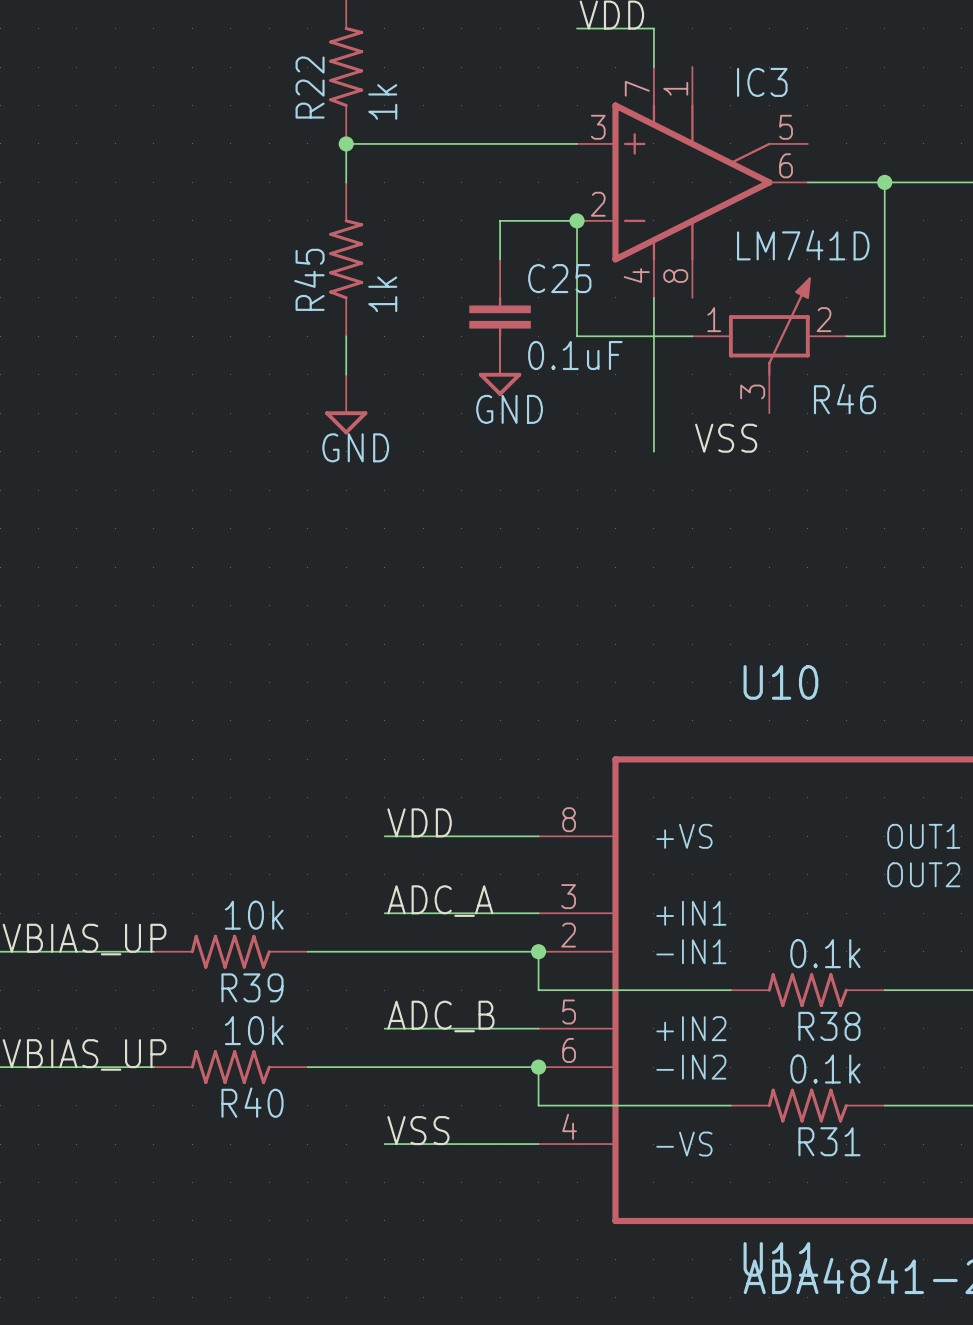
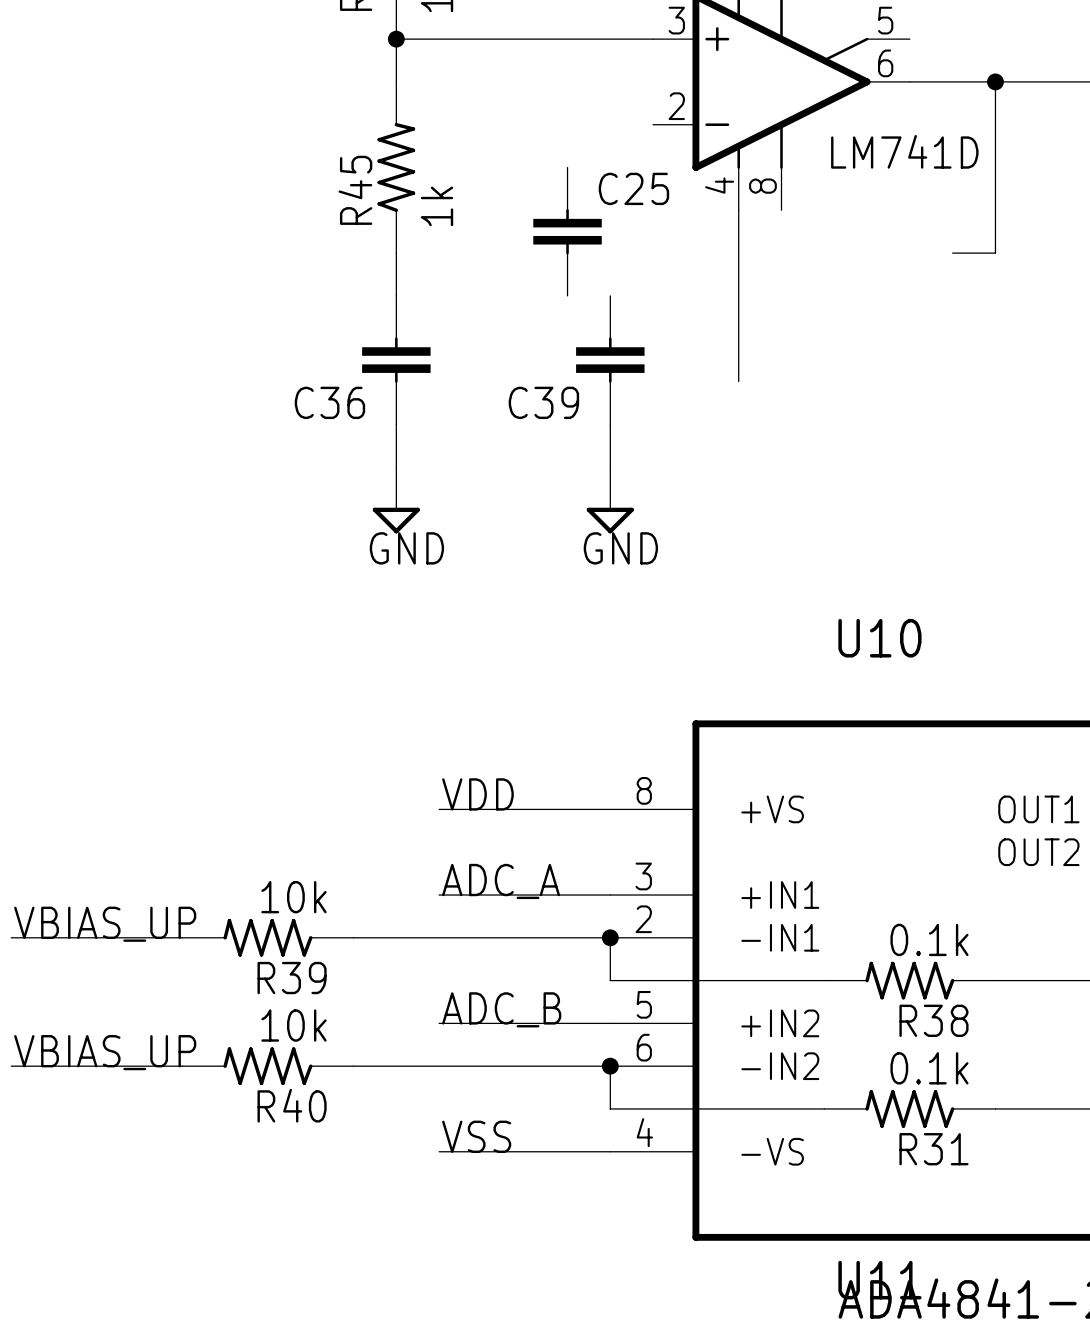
junction: (577, 220) -> none
wire: (500, 259) (500, 220) (577, 220) (577, 336) (692, 336) -> none
R46: (769, 345) -> none
C25 value: 0.1uF (575, 355) -> none
power symbol: GND (500, 366) -> none
power symbol: GND (346, 404) -> none
C36: none -> (396, 360)
C39: none -> (610, 360)
label: VSS (726, 438) -> none
wire: none -> (396, 424) (396, 467)
wire: none -> (610, 424) (610, 467)
power symbol: none -> GND (396, 500)
power symbol: none -> GND (610, 500)

